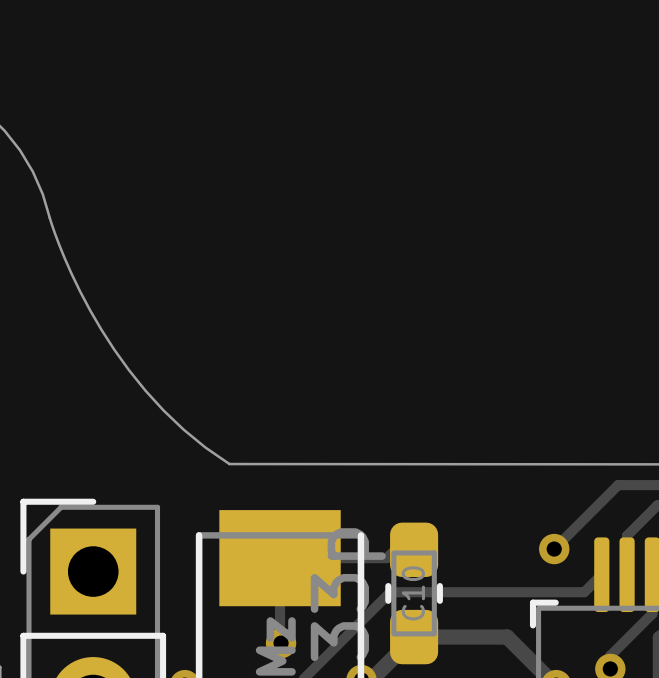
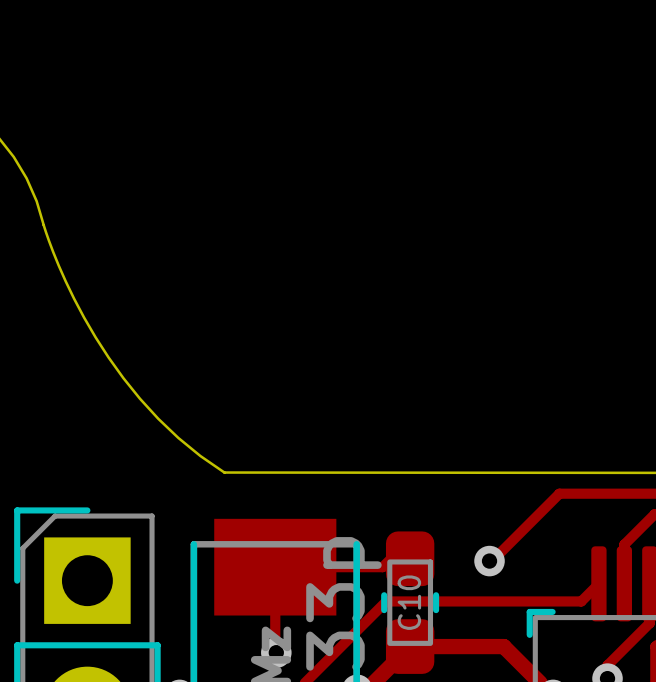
track: (618, 485) (554, 549) -> (615, 493) (559, 493) (492, 561) (489, 561)
via position: (554, 549) -> (489, 561)

